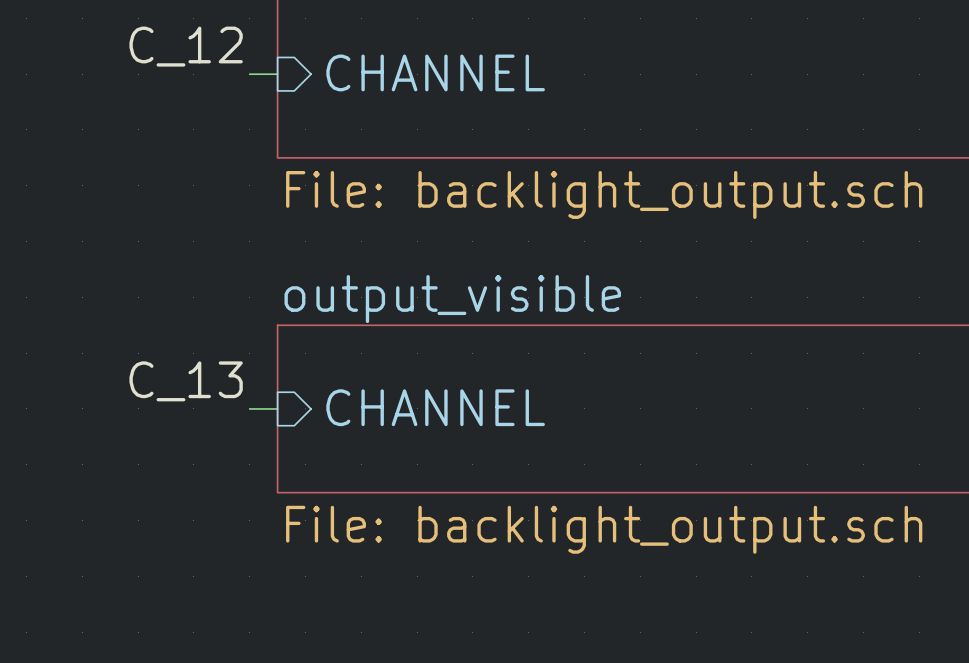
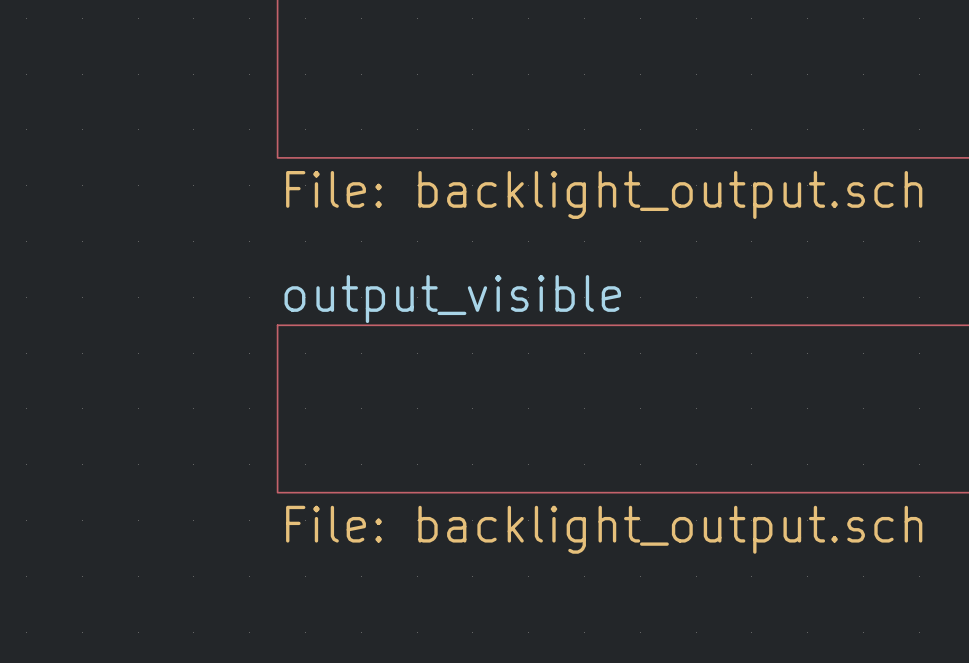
label: C_12 (186, 46) -> none
sheet pin: CHANNEL (435, 72) -> none
wire: (249, 74) (277, 74) -> none
label: C_13 (186, 381) -> none
sheet pin: CHANNEL (435, 407) -> none
wire: (249, 408) (277, 408) -> none

